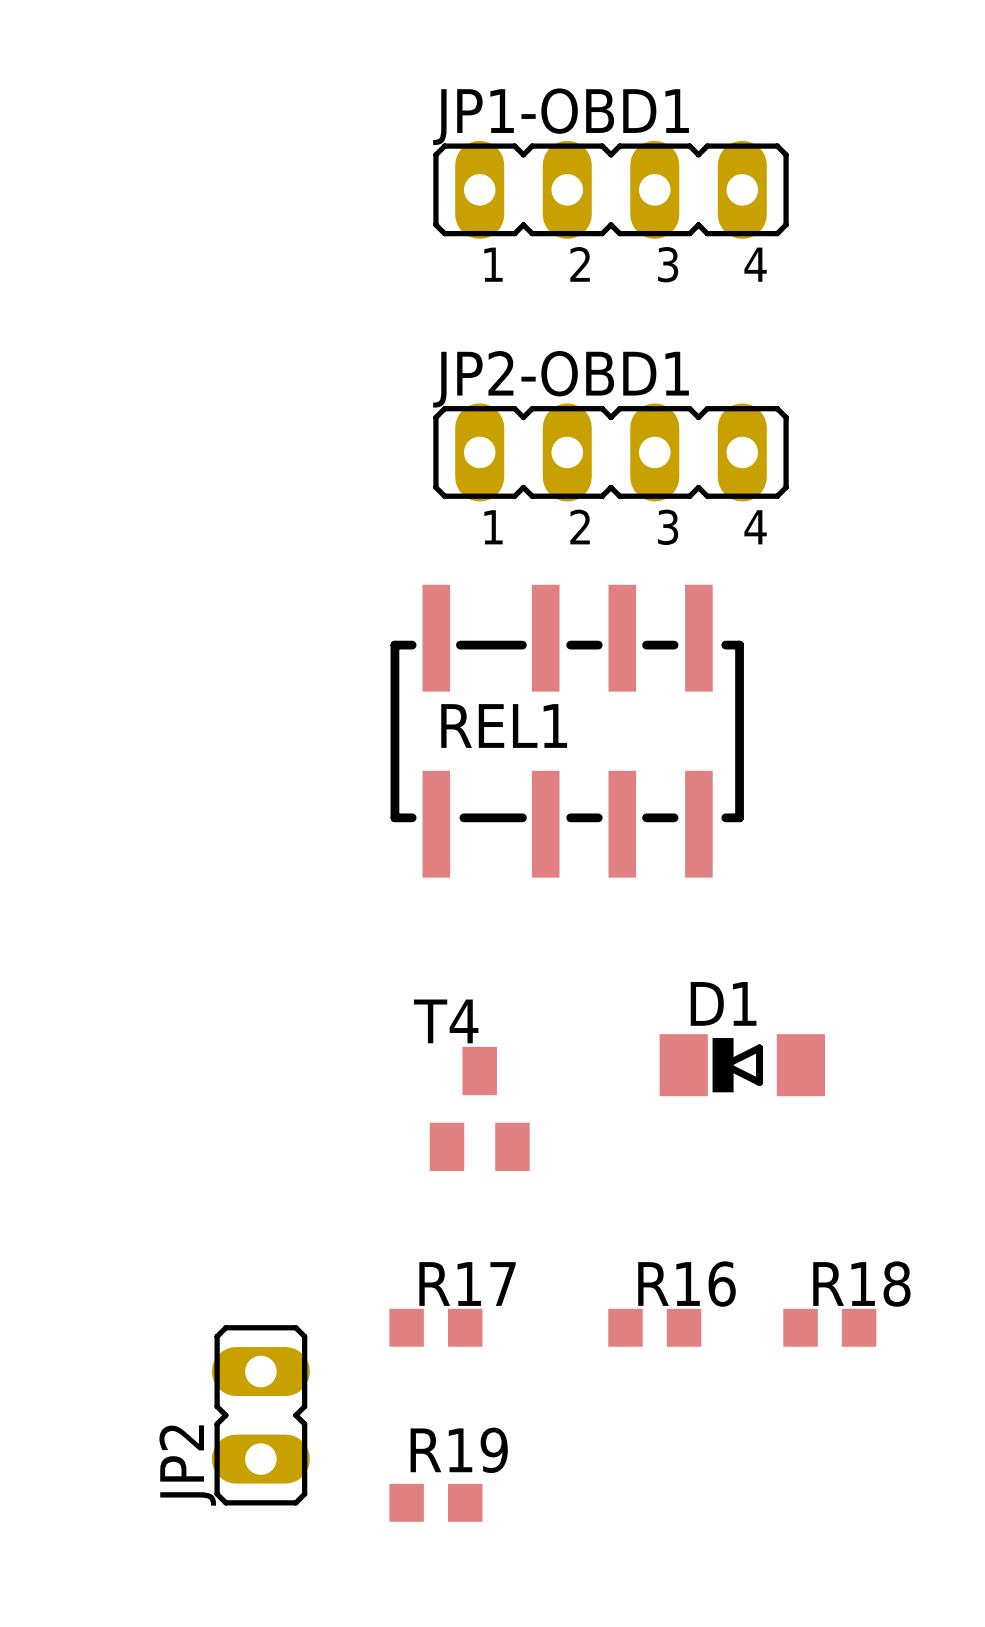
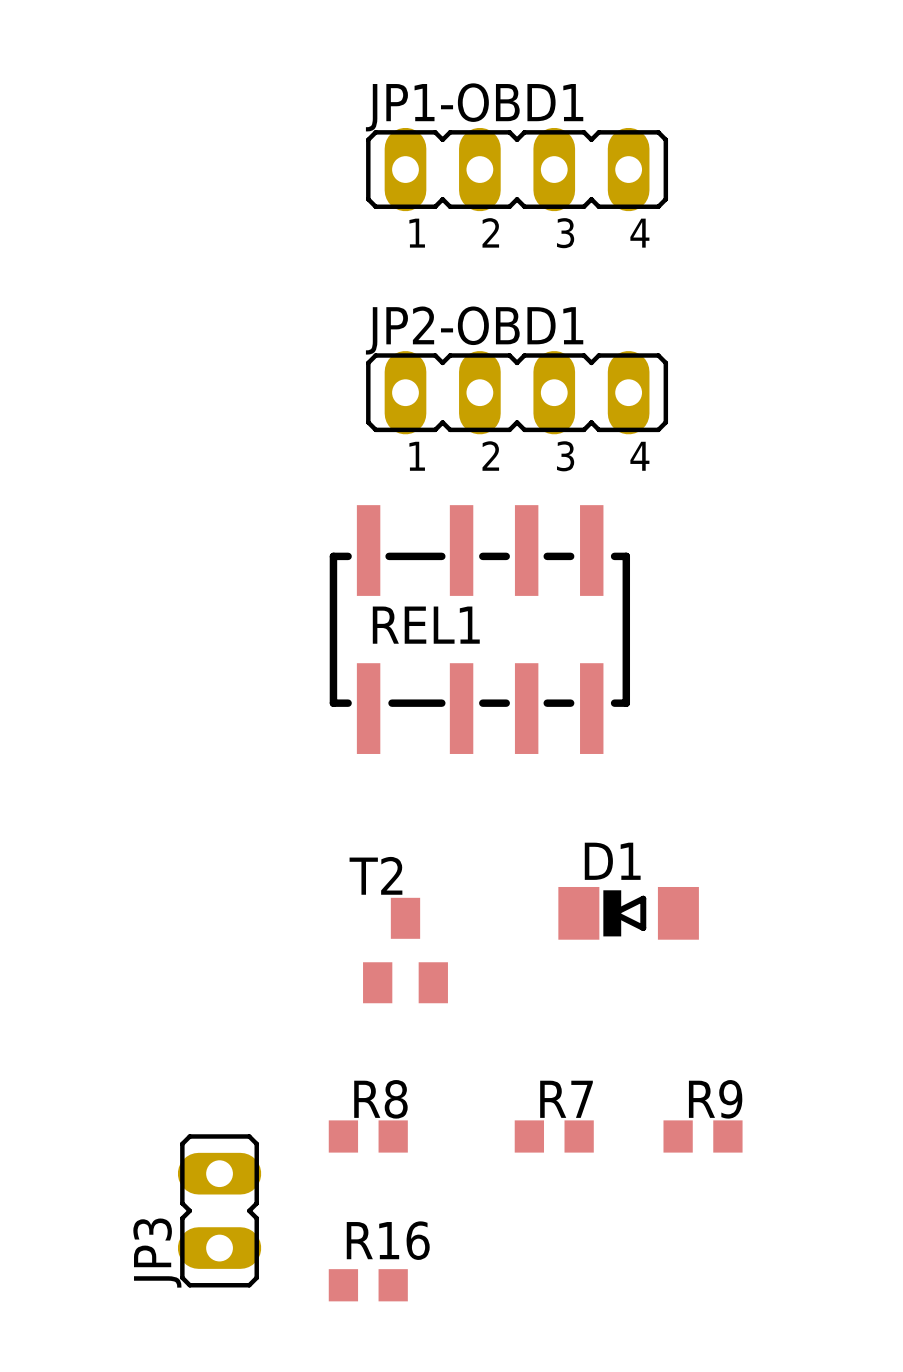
T4 name: T4 (446, 1021) -> T2 (375, 875)
R17 name: R17 (467, 1284) -> R8 (380, 1099)
R16 name: R16 (686, 1284) -> R7 (566, 1099)
R18 name: R18 (861, 1284) -> R9 (715, 1099)
R19 name: R19 (459, 1450) -> R16 (388, 1240)
JP2 name: JP2 (187, 1465) -> JP3 (157, 1253)

